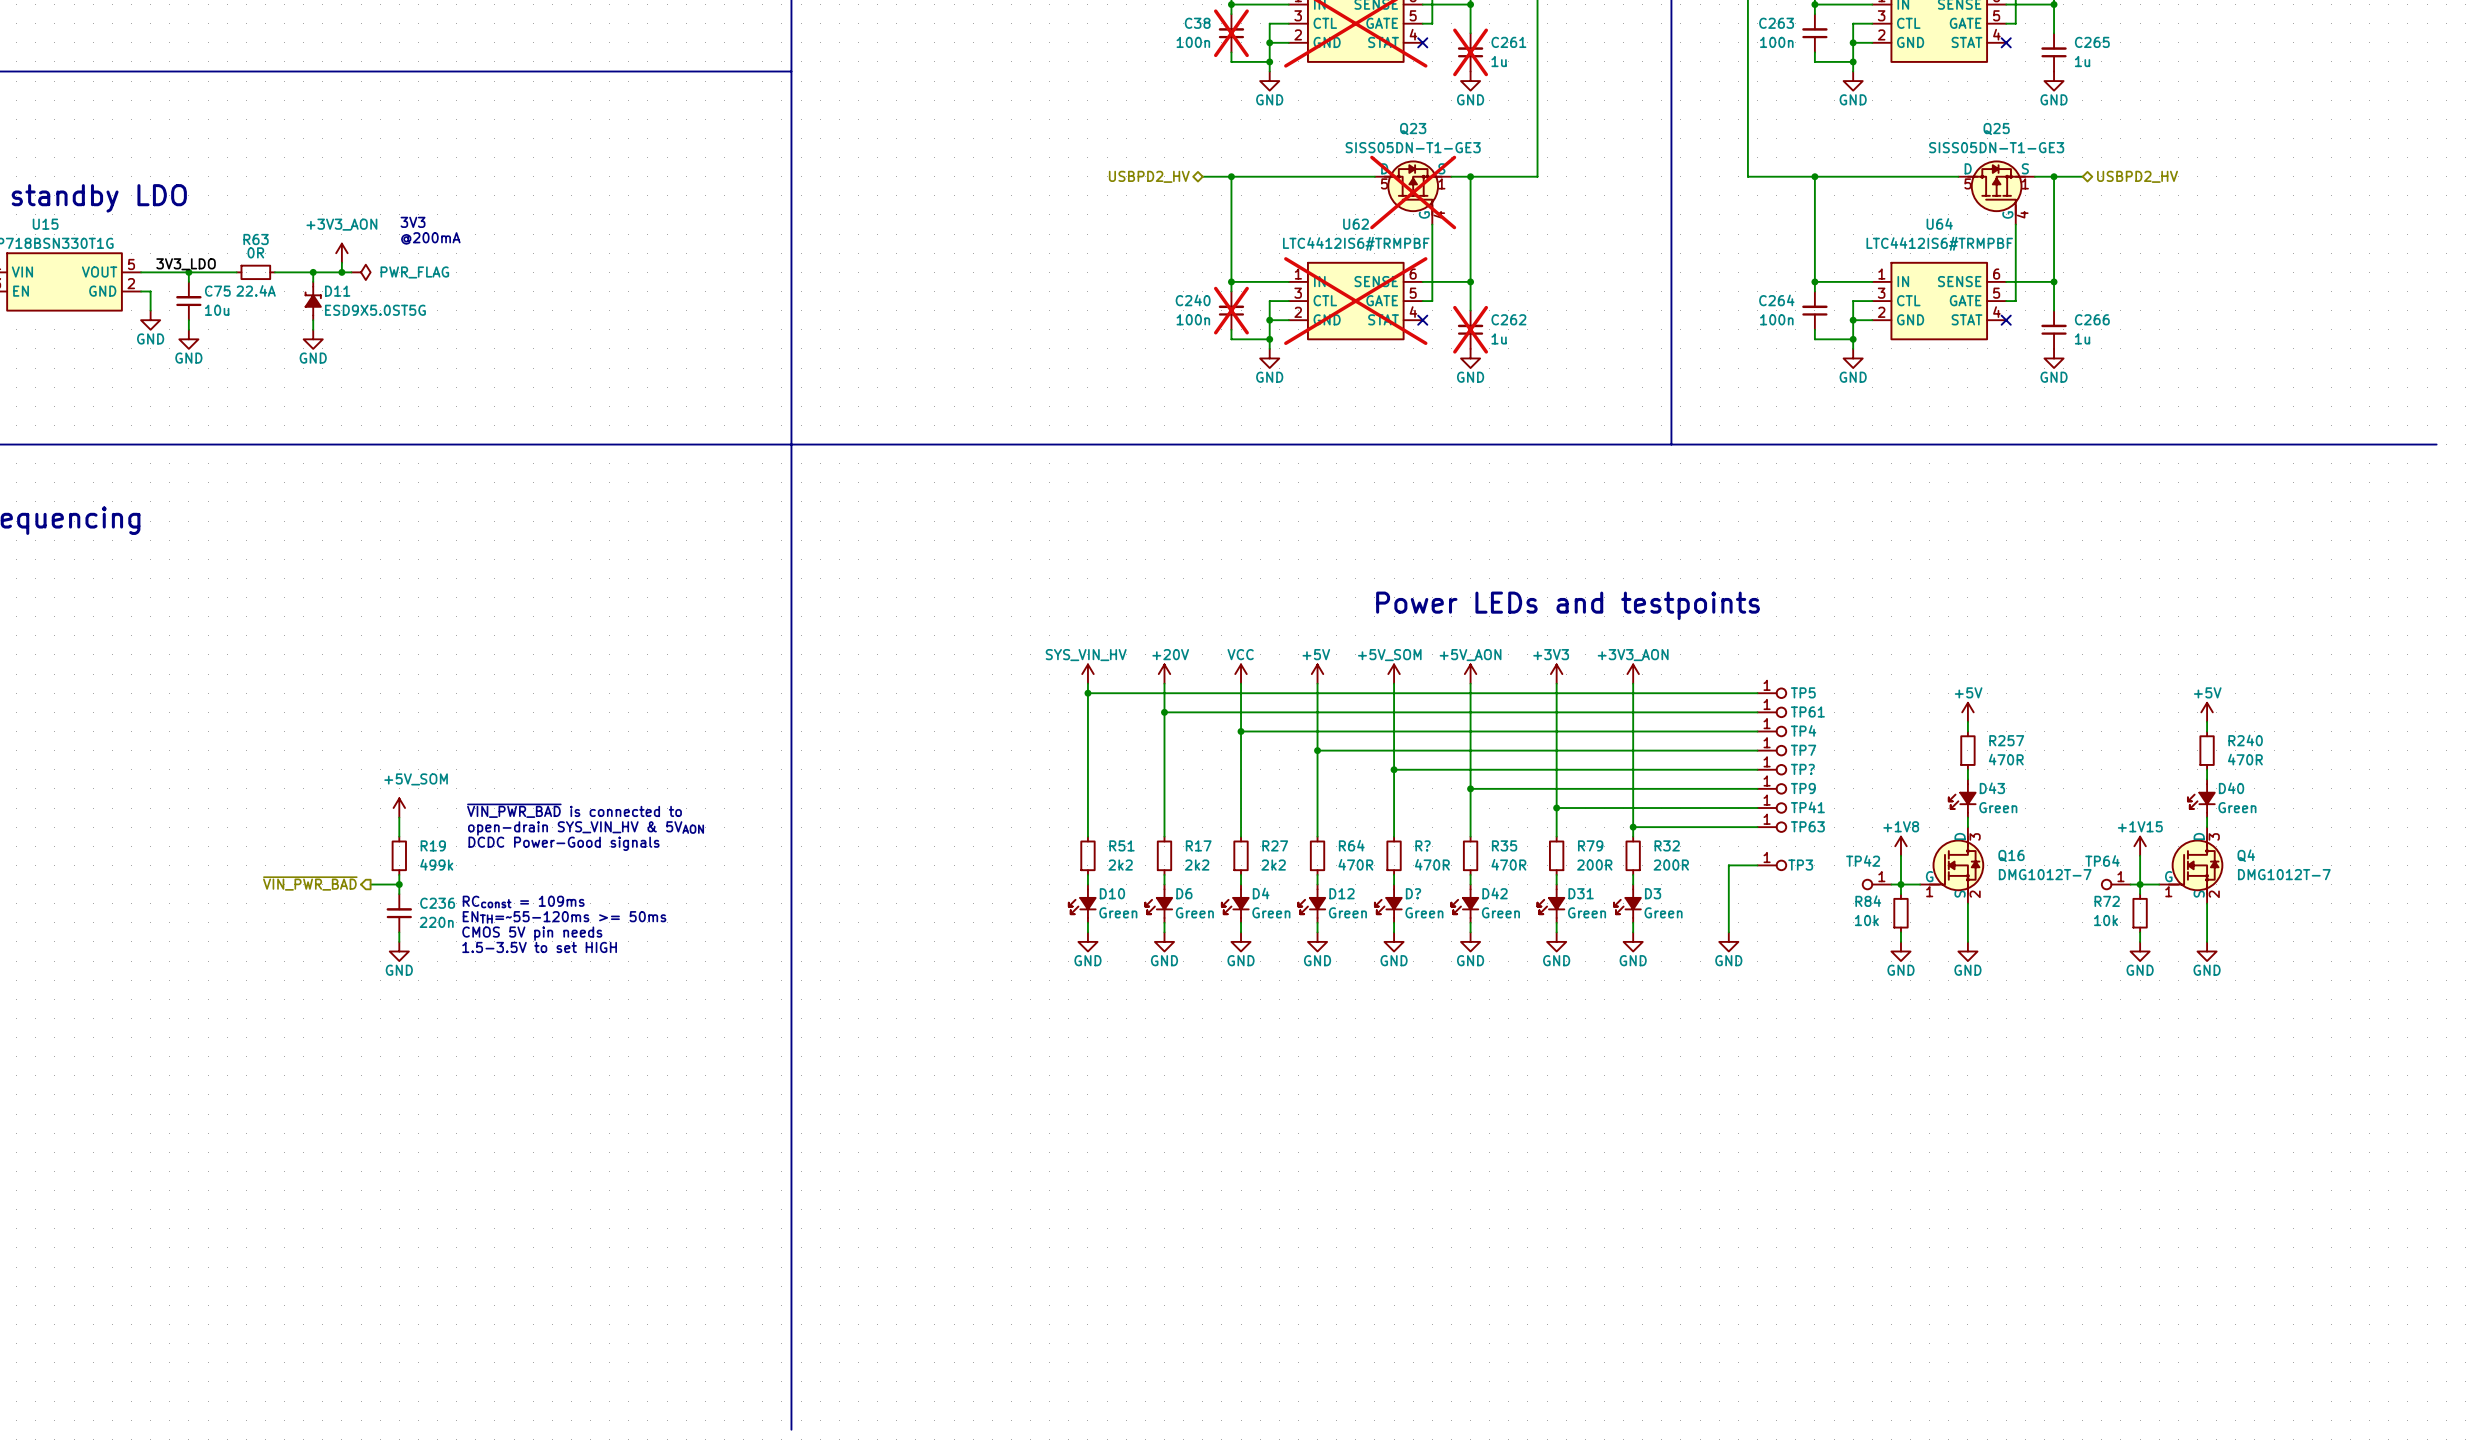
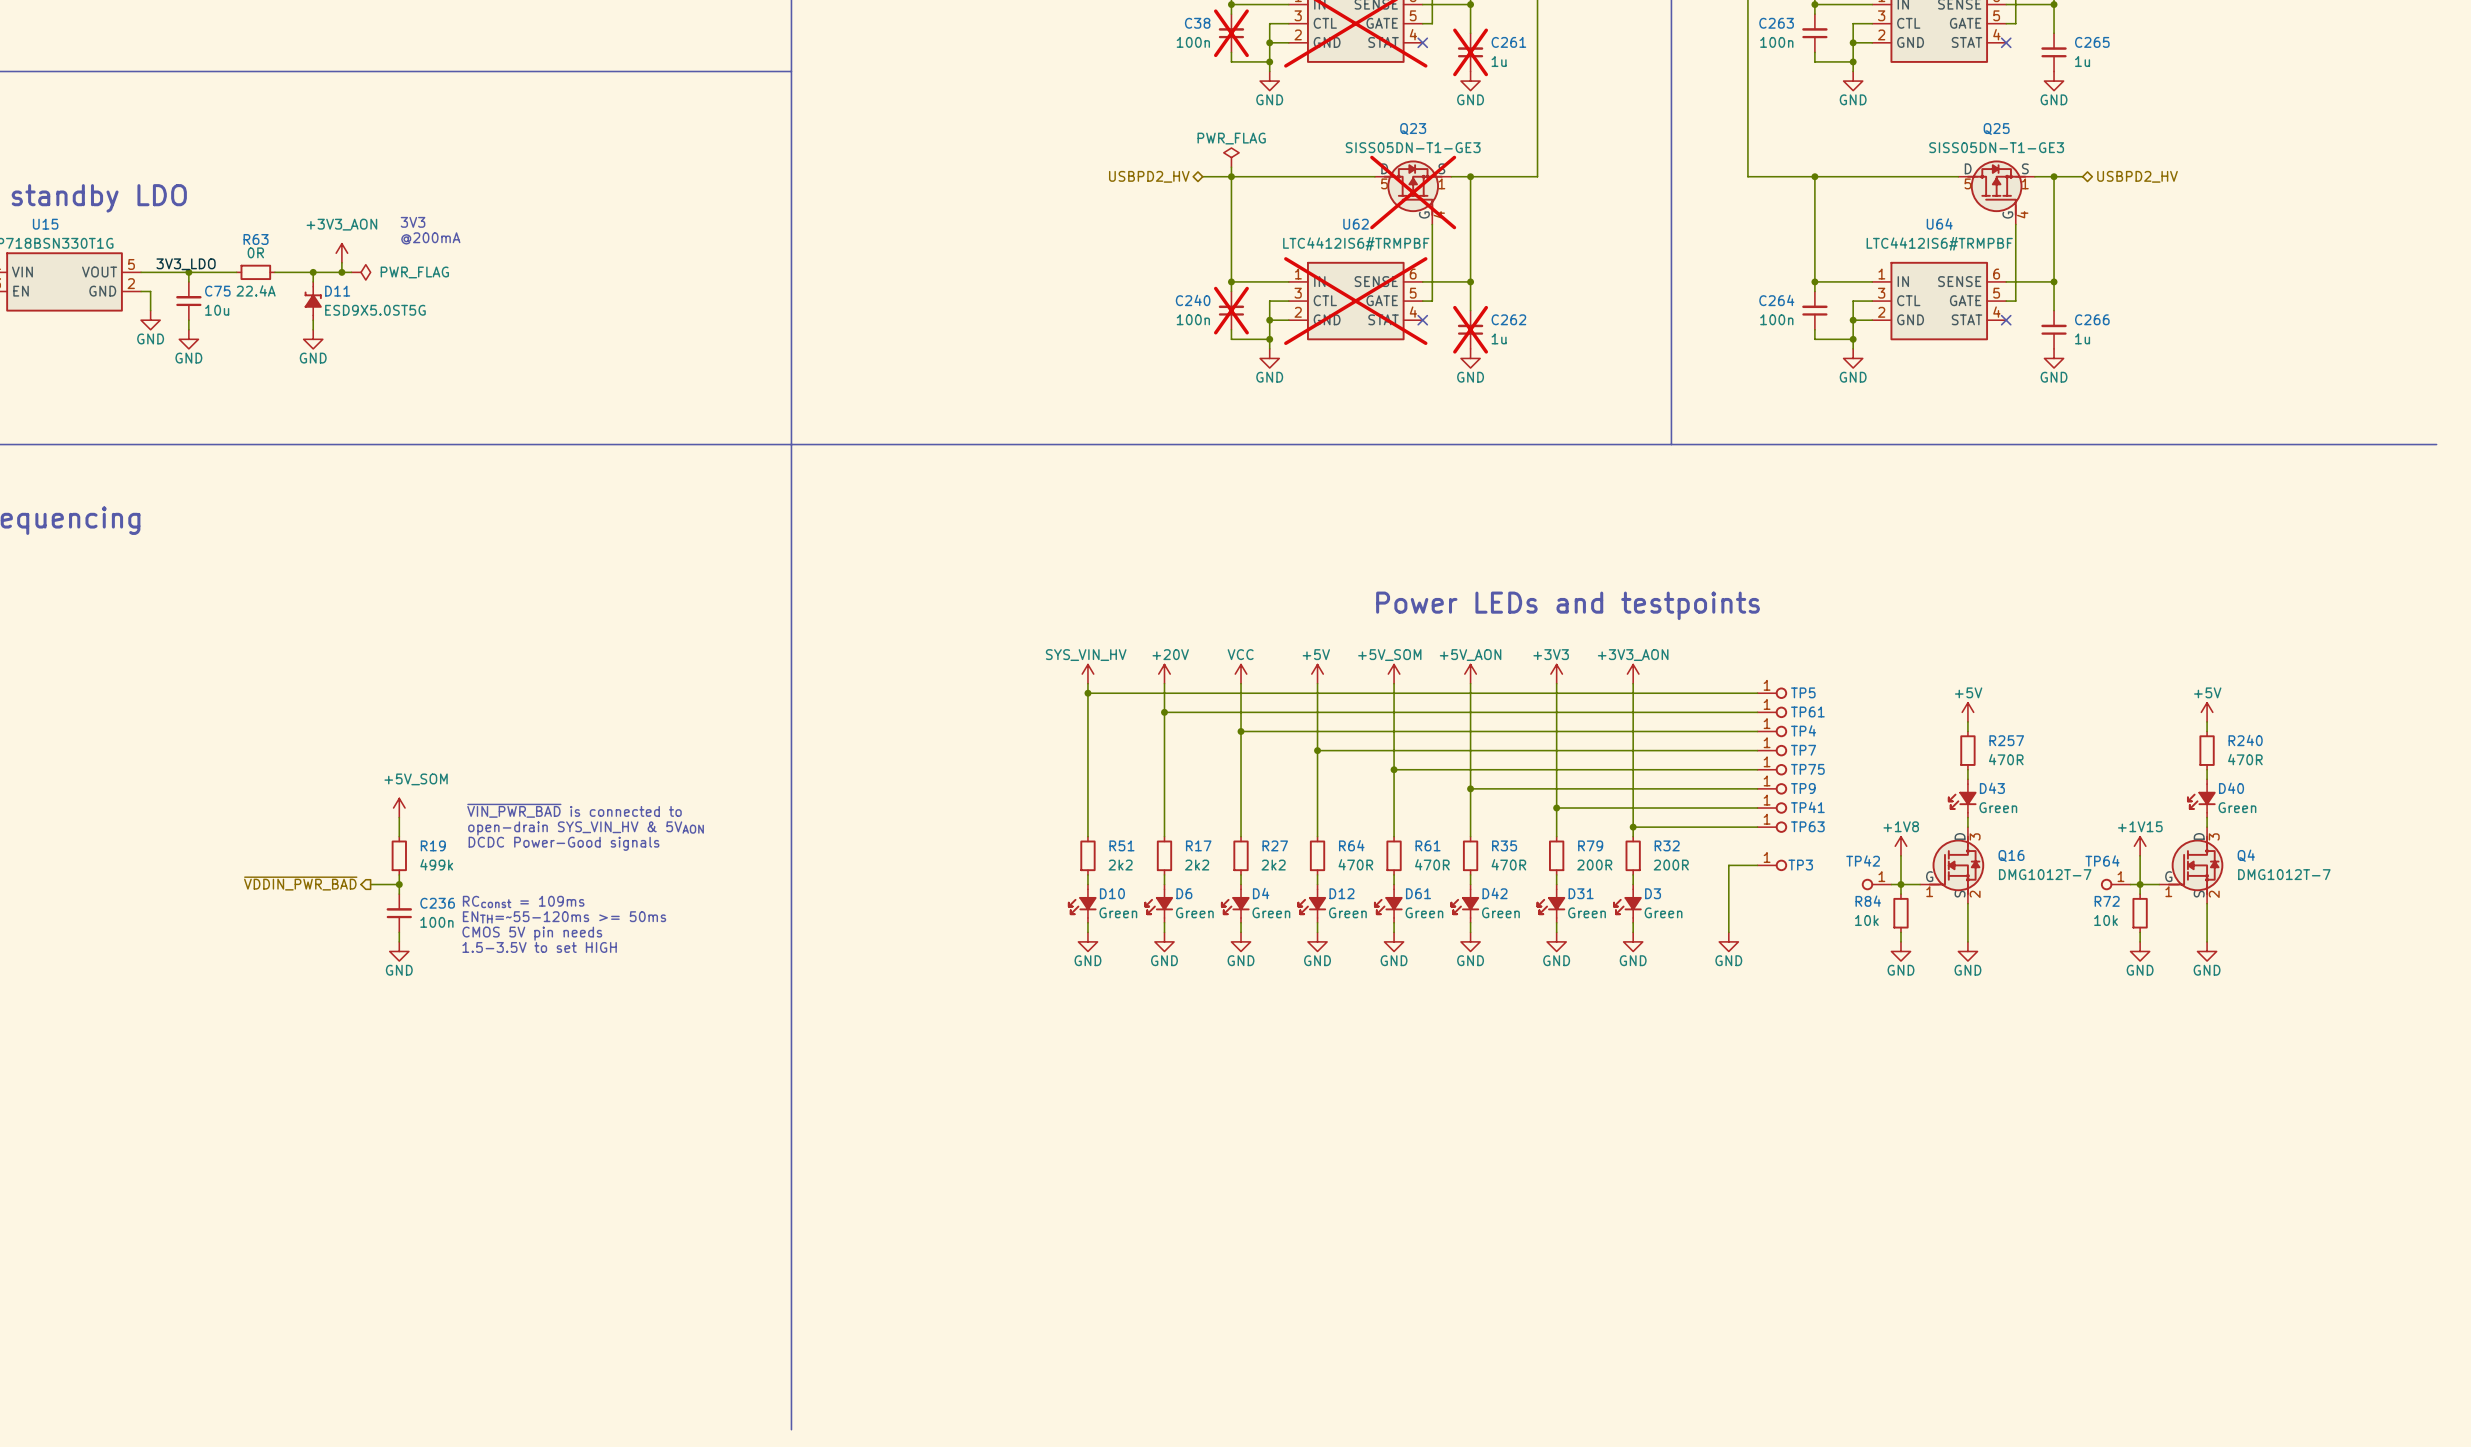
power symbol: none -> PWR_FLAG (1231, 157)
wire: none -> (1231, 167) (1231, 176)
TP? name: TP? (1802, 769) -> TP75 (1807, 769)
R? name: R? (1423, 845) -> R61 (1428, 845)
hierarchical label: ~{VIN_PWR_BAD} (310, 883) -> ~{VDDIN_PWR_BAD} (300, 883)
D? name: D? (1413, 893) -> D61 (1418, 893)
C236 text: 220n (436, 922) -> 100n (436, 922)

